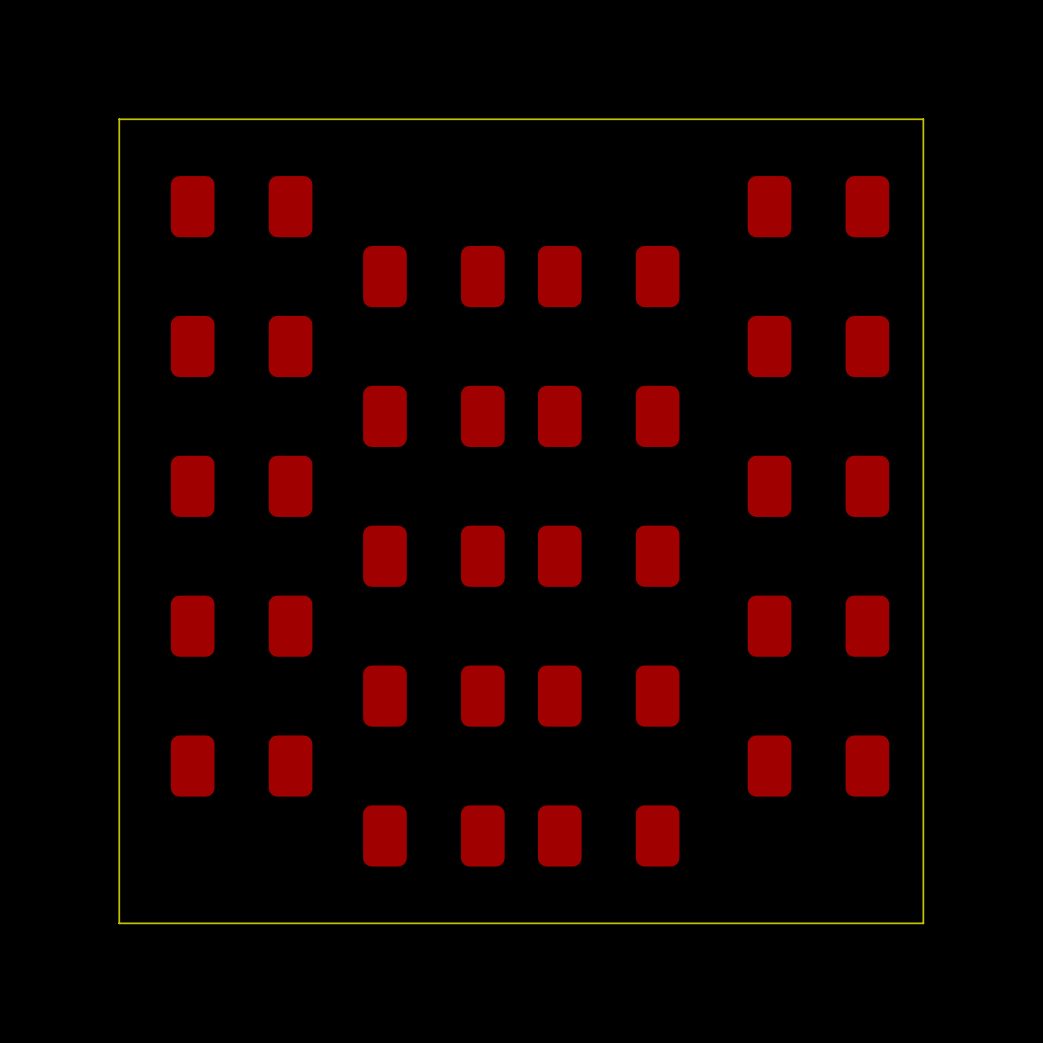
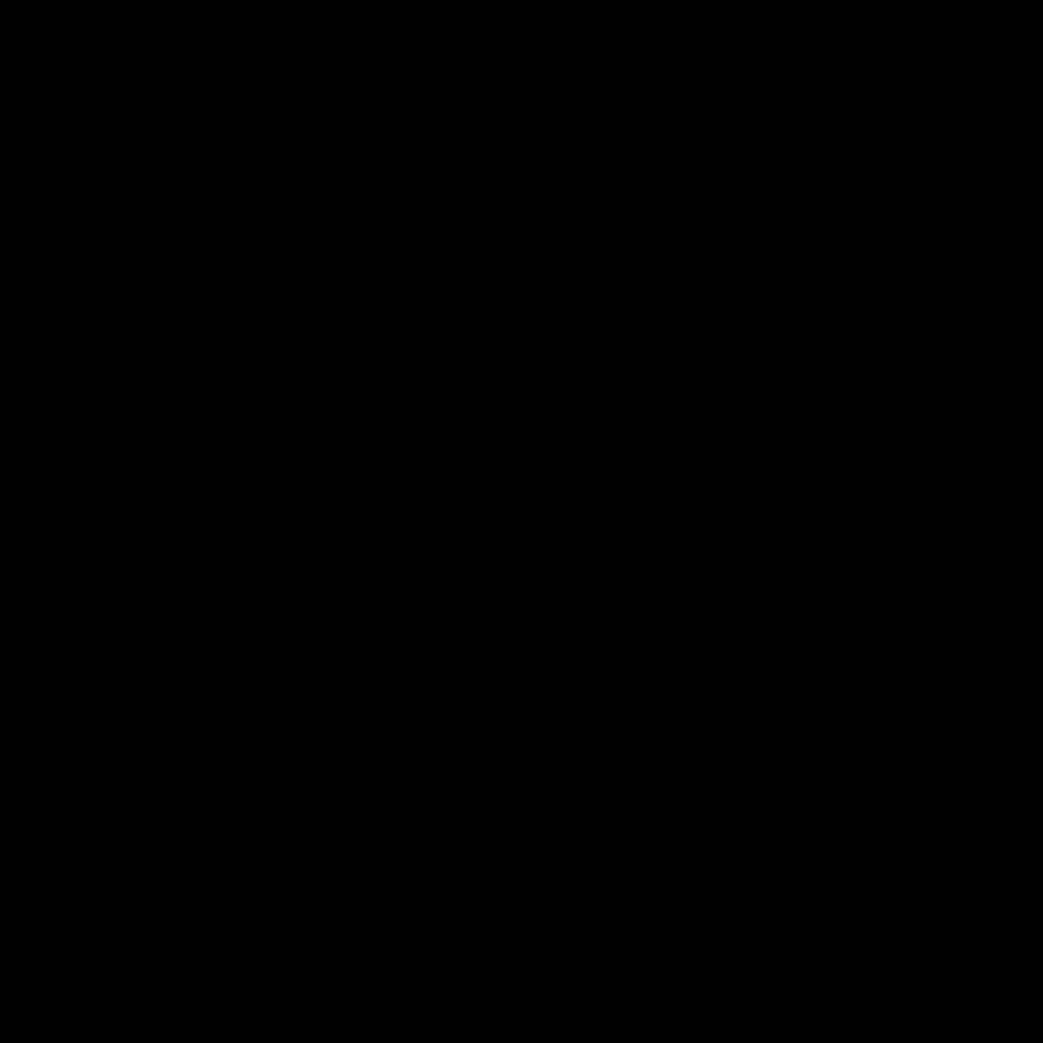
board edge: (923, 119) (119, 119) (119, 923) (923, 923) (923, 119) -> none
part: (241, 206) -> none
part: (818, 206) -> none
part: (433, 276) -> none
part: (608, 276) -> none
part: (241, 346) -> none
part: (818, 346) -> none
part: (433, 416) -> none
part: (608, 416) -> none
part: (241, 486) -> none
part: (818, 486) -> none
part: (433, 556) -> none
part: (608, 556) -> none
part: (241, 626) -> none
part: (818, 626) -> none
part: (433, 696) -> none
part: (608, 696) -> none
part: (241, 766) -> none
part: (818, 766) -> none
part: (433, 835) -> none
part: (608, 835) -> none

